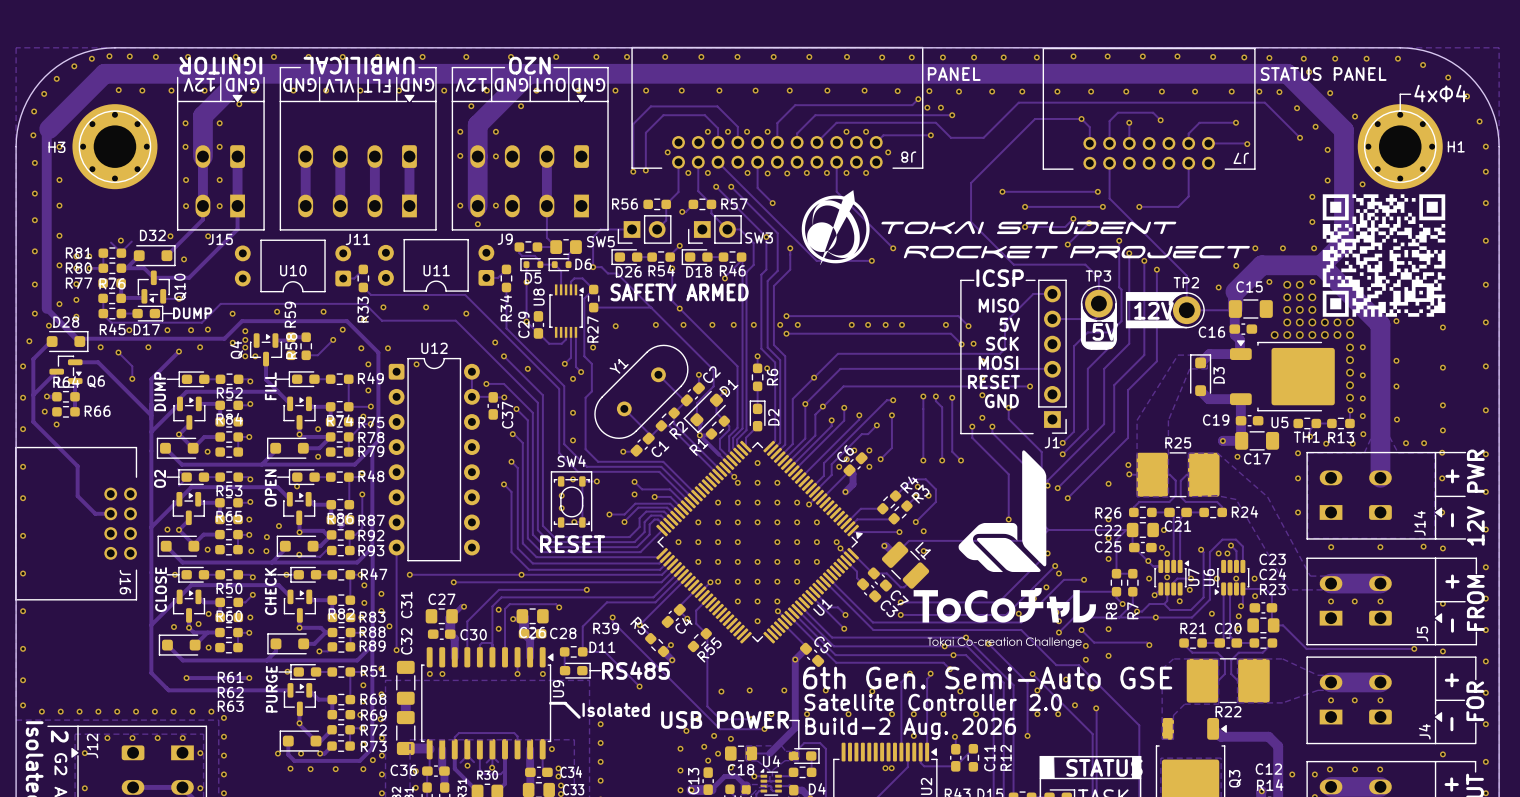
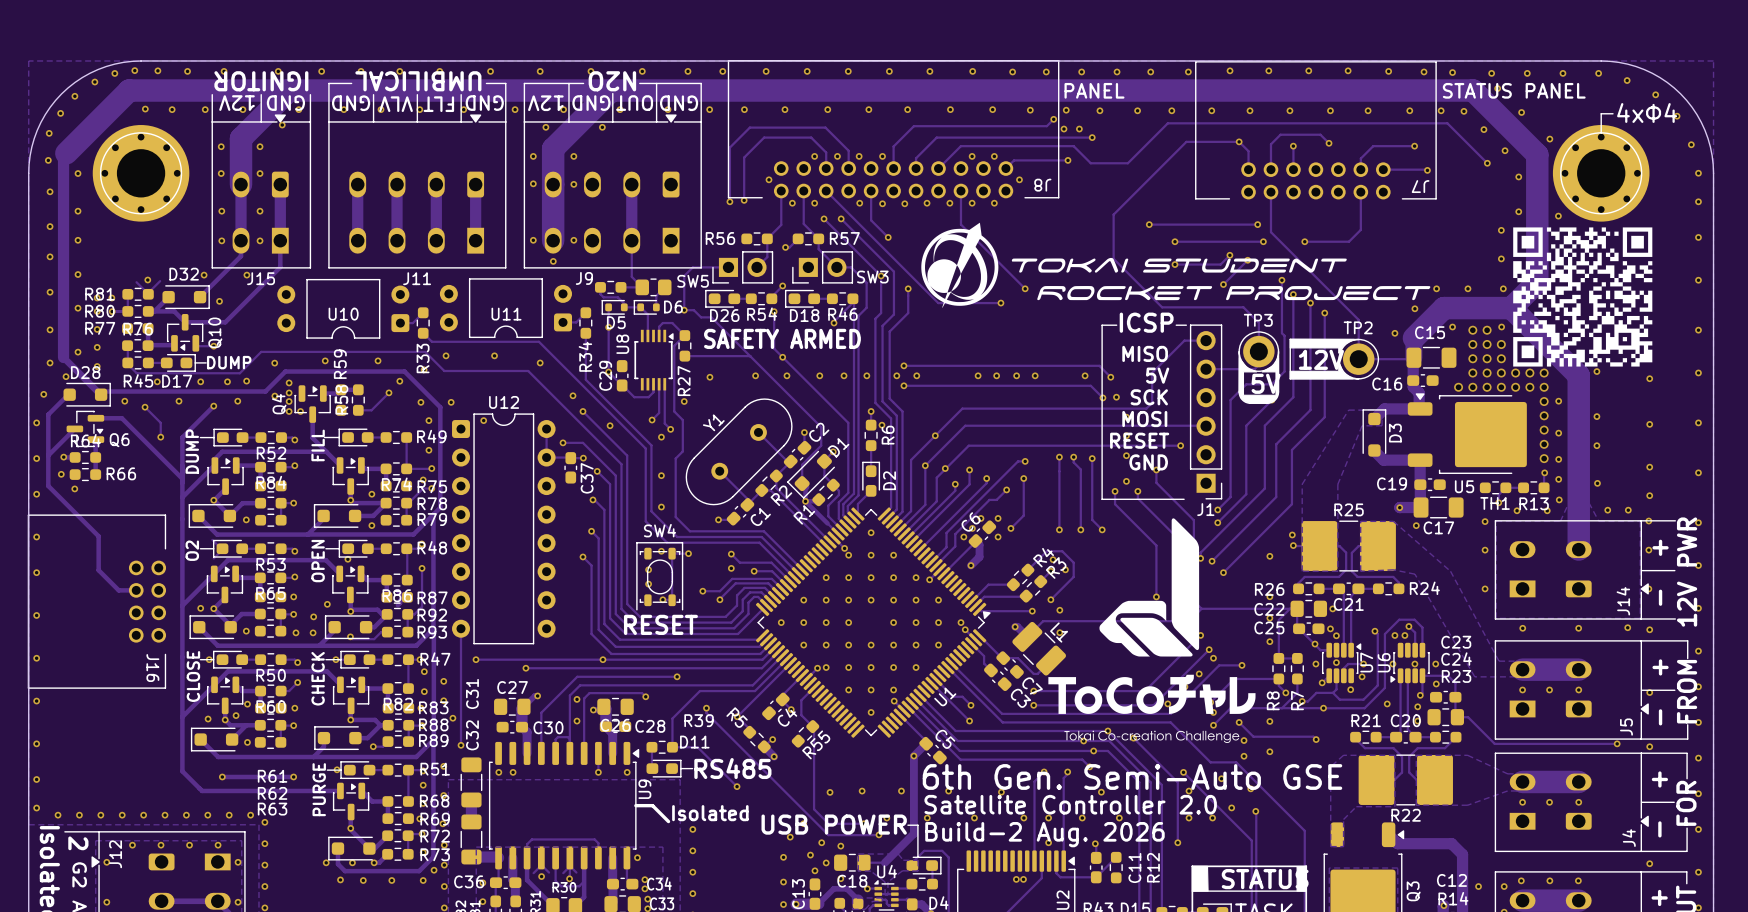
H1 name: H1 (1456, 146) -> none
H3 name: H3 (56, 147) -> none

